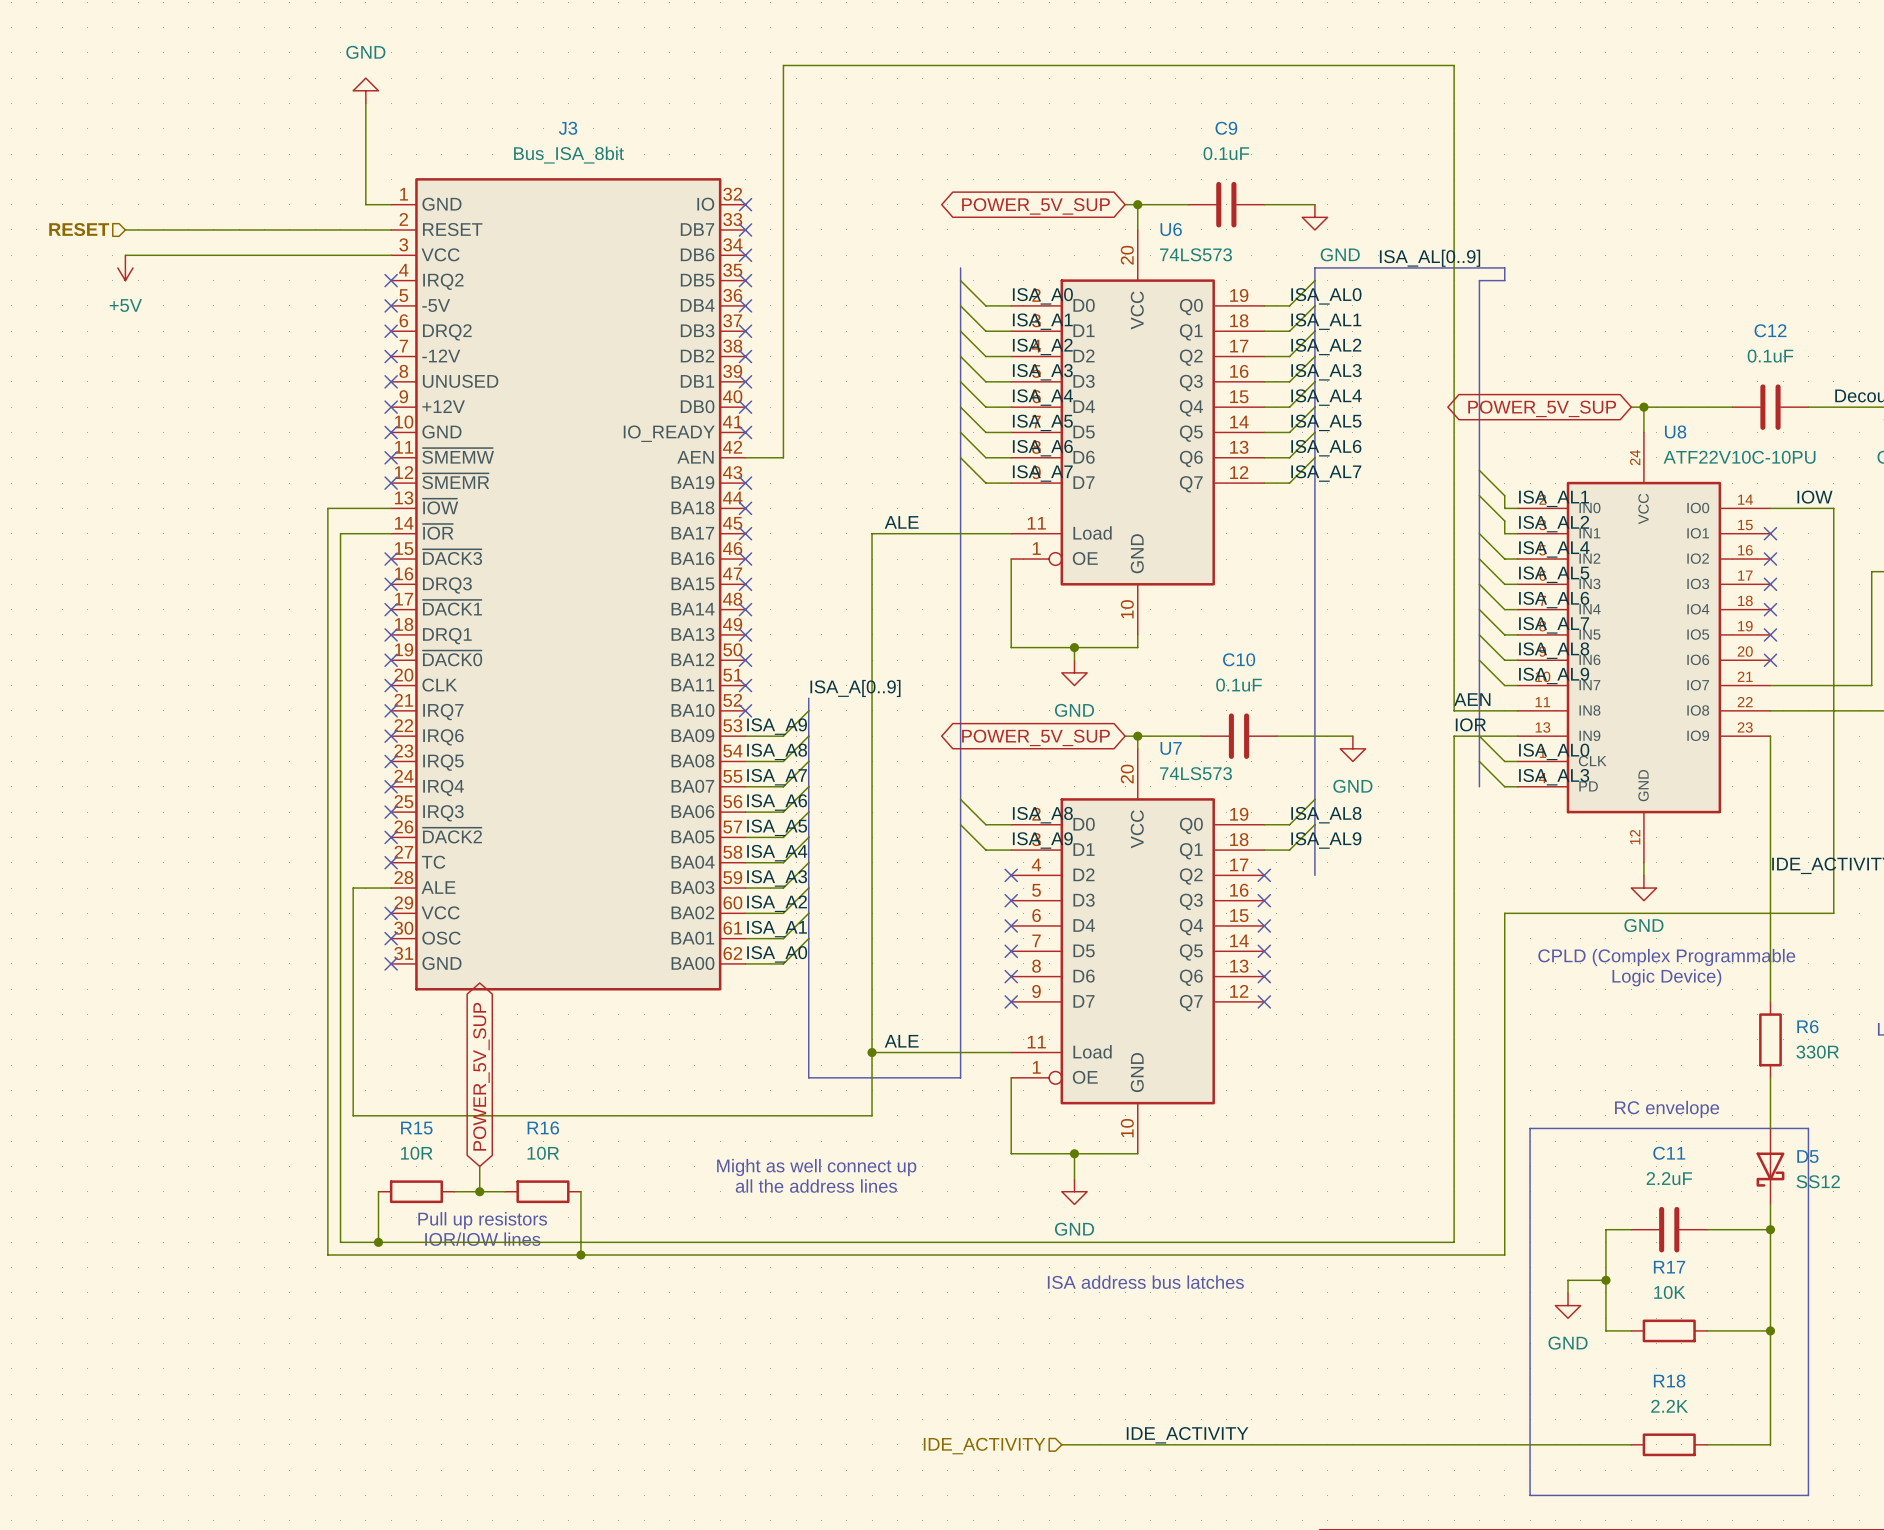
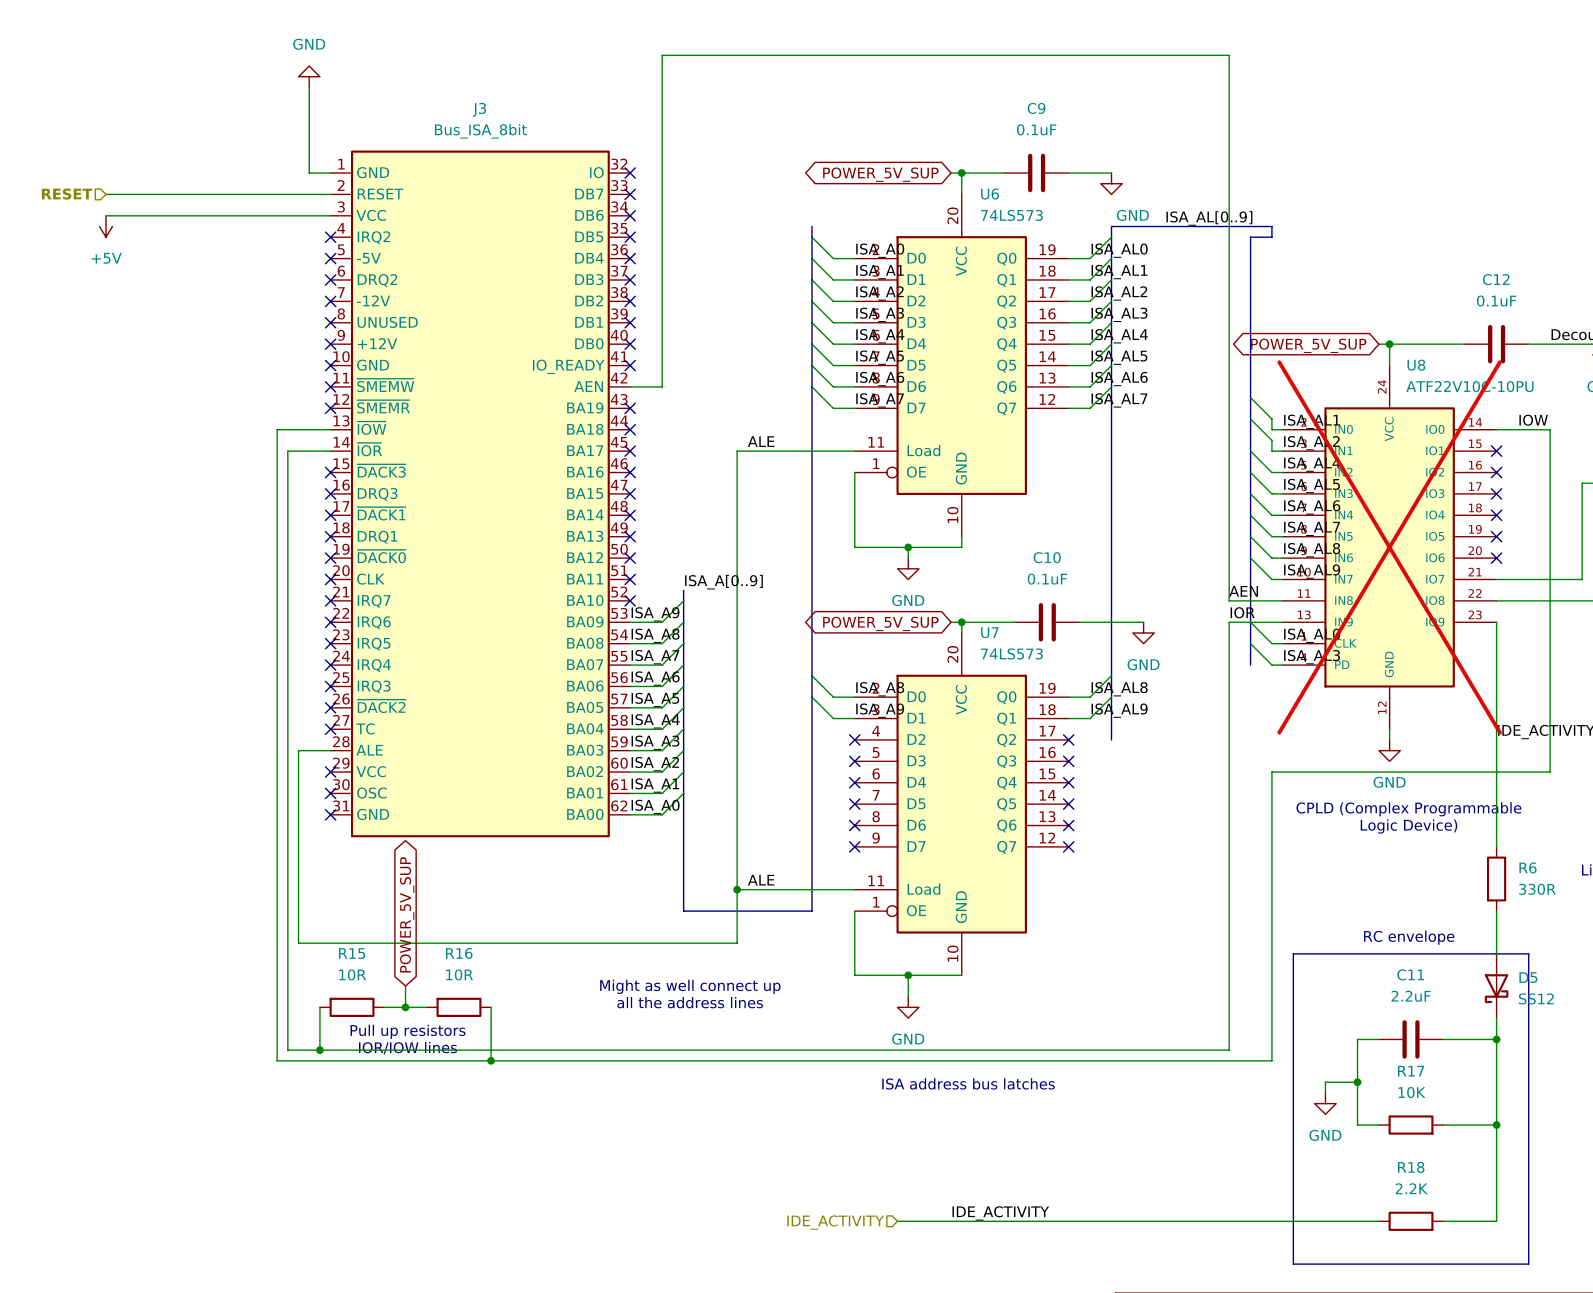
U8 do-not-place cross: none -> (1389, 547)

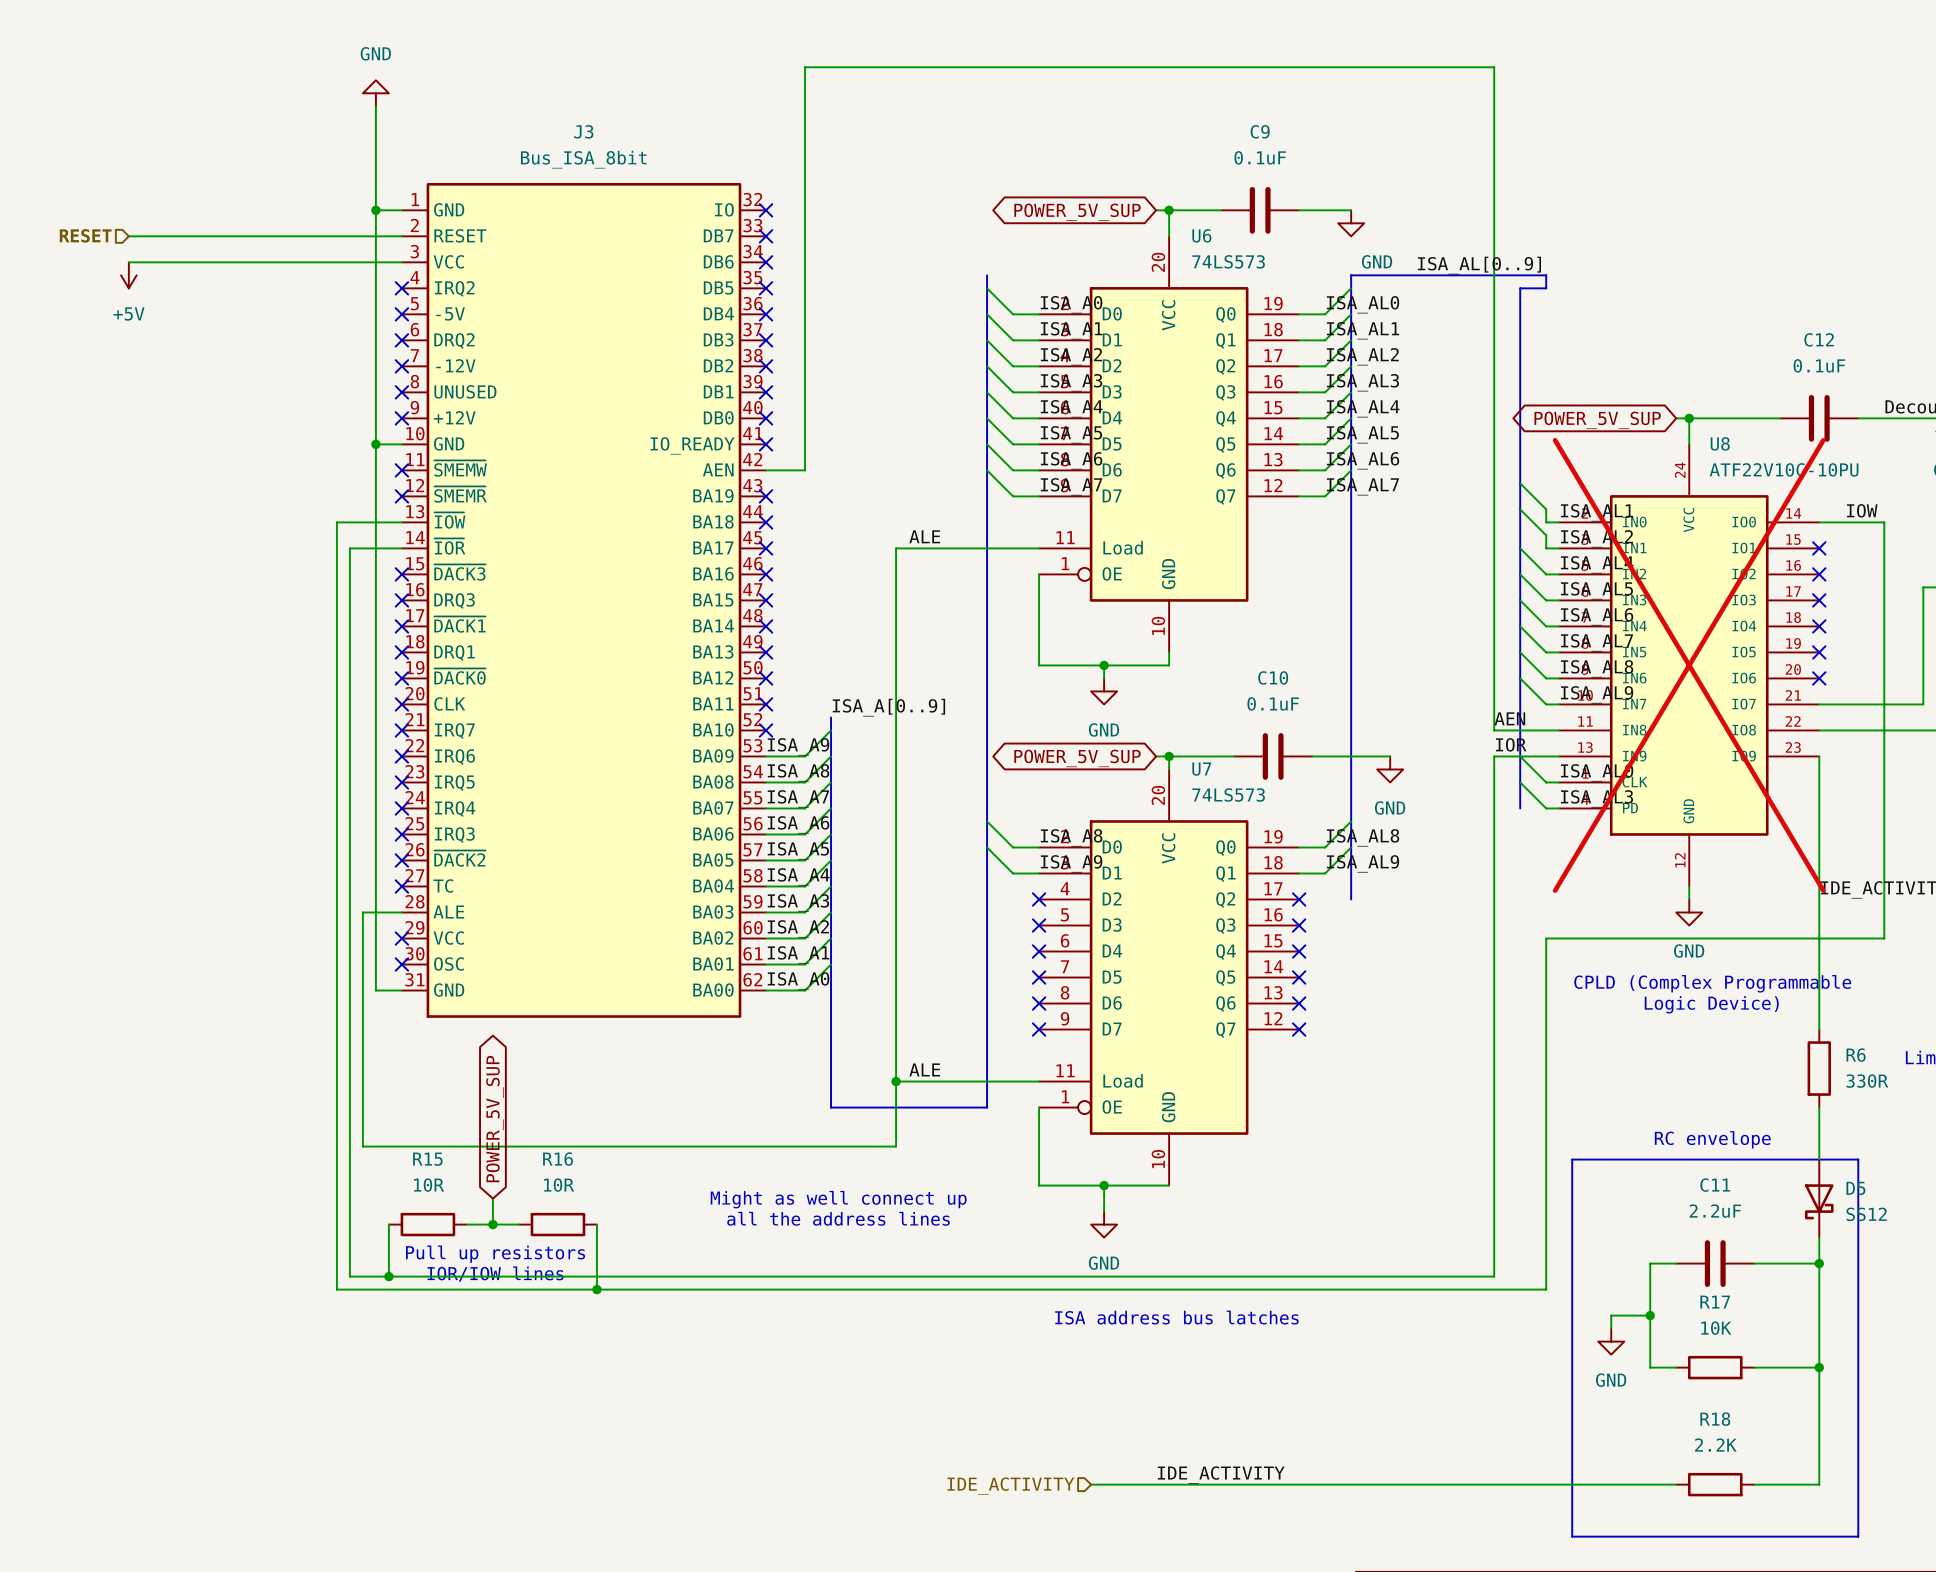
wire: none -> (375, 210) (375, 990) (401, 990)
junction: none -> (375, 210)
wire: none -> (375, 444) (401, 444)
junction: none -> (375, 444)
no-connect mark: (330, 365) -> none
no-connect mark: (330, 814) -> none

